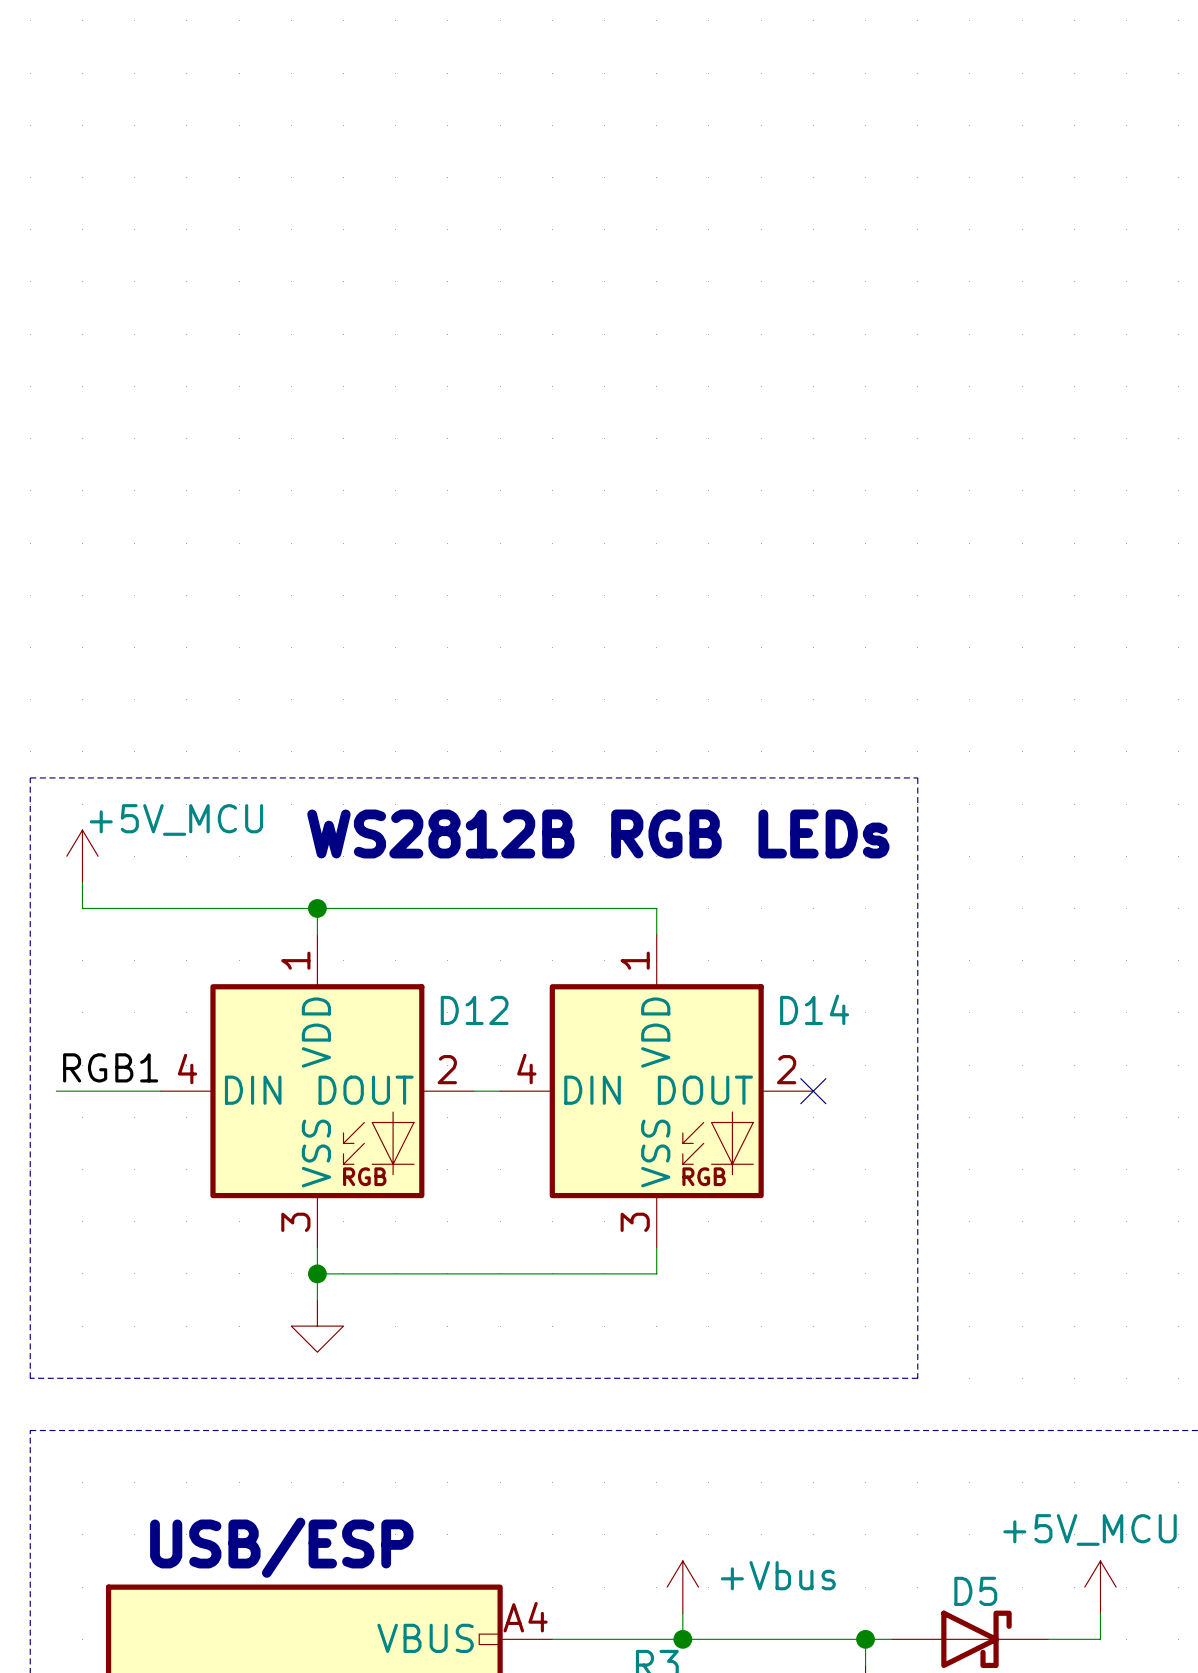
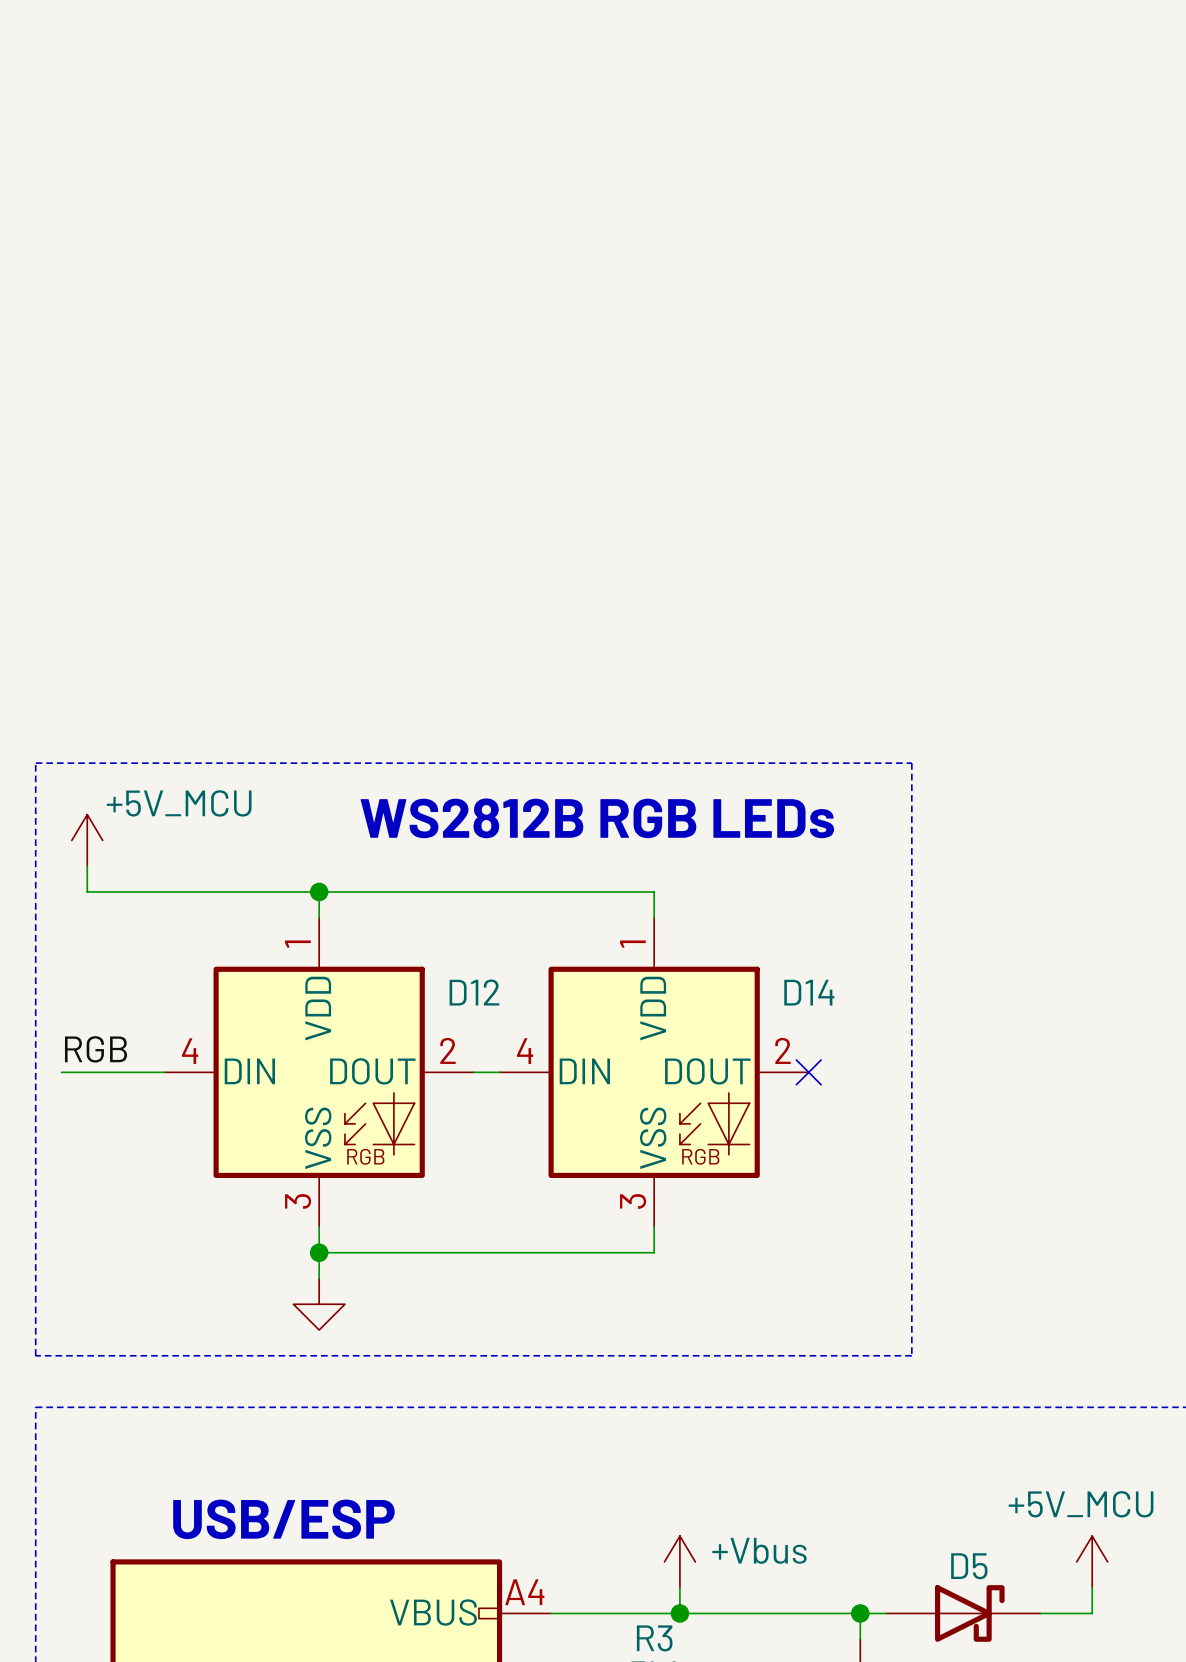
label: RGB1 (110, 1067) -> RGB (95, 1049)

